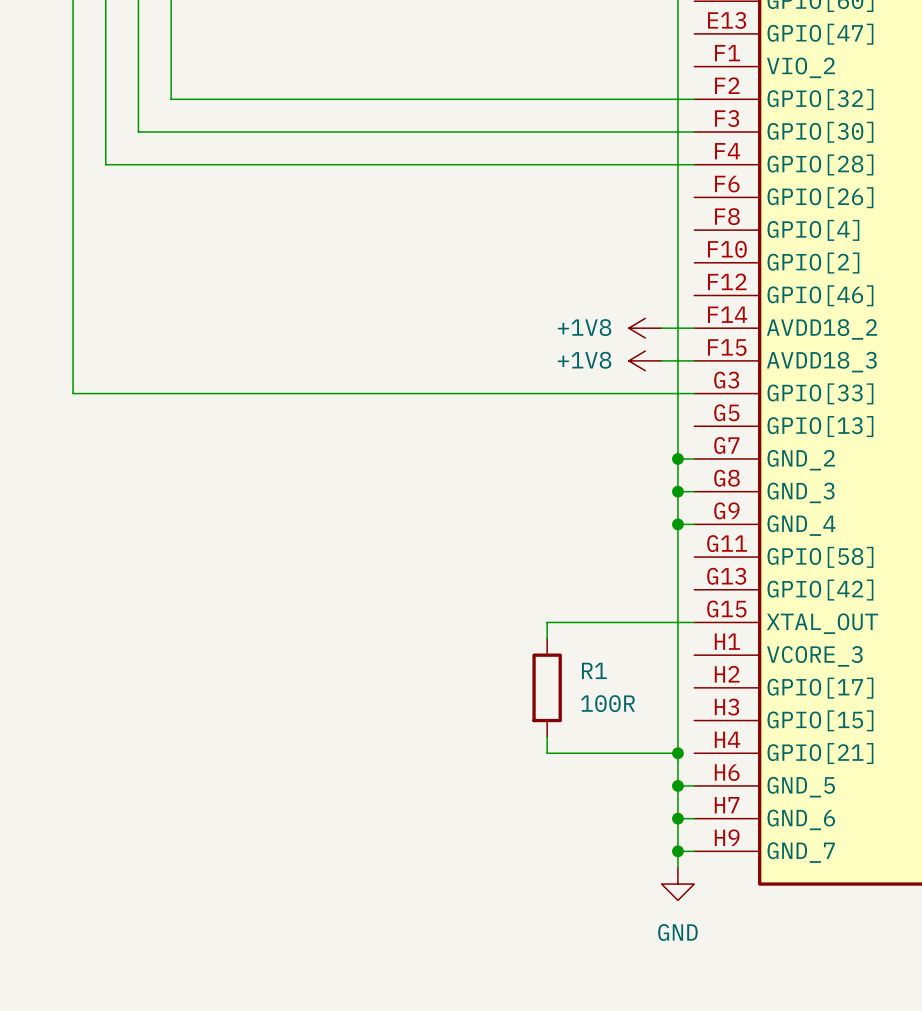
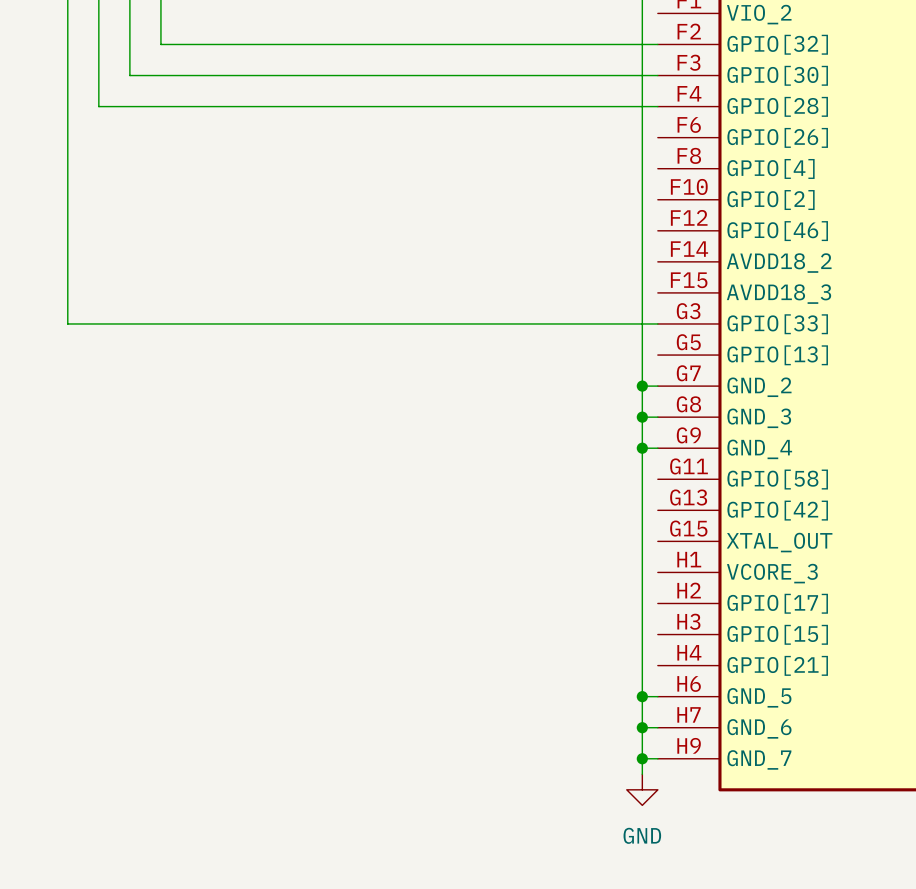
power symbol: +1V8 (645, 328) -> none
wire: (661, 328) (694, 328) -> none
power symbol: +1V8 (645, 360) -> none
wire: (661, 360) (694, 360) -> none
wire: (694, 622) (547, 622) (547, 638) -> none
R1: 100R (547, 687) -> none
wire: (547, 736) (547, 753) (677, 753) -> none
junction: (677, 753) -> none

